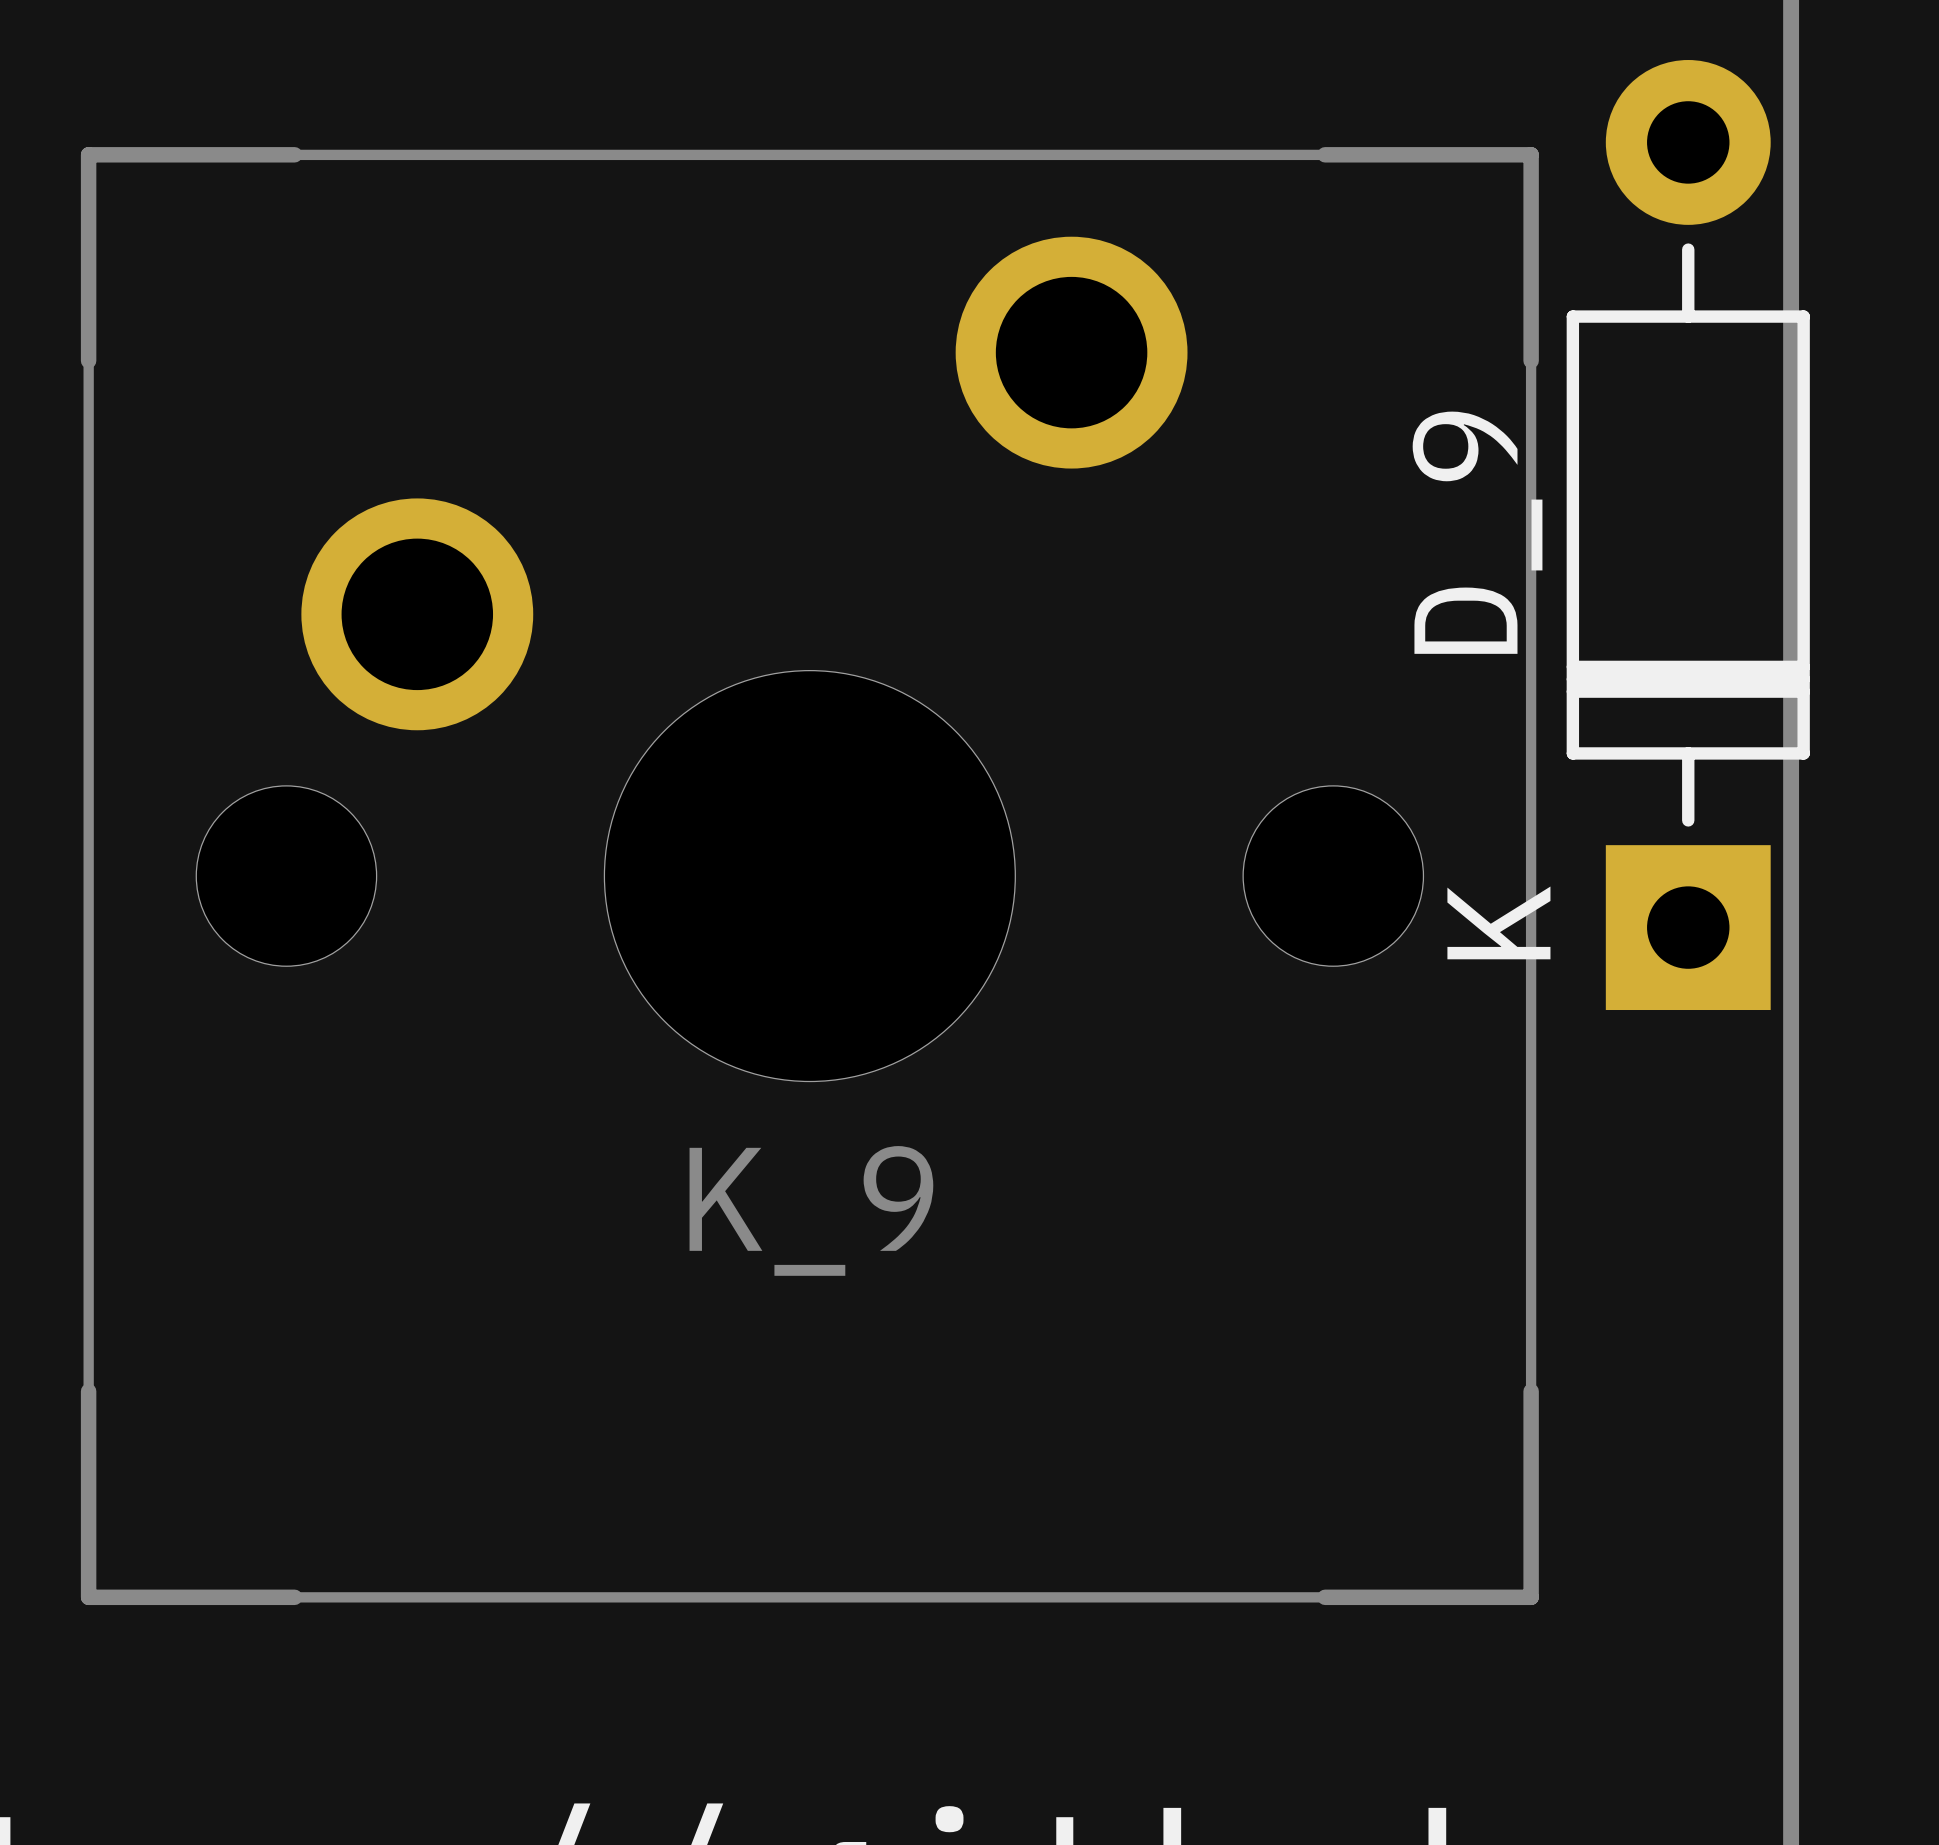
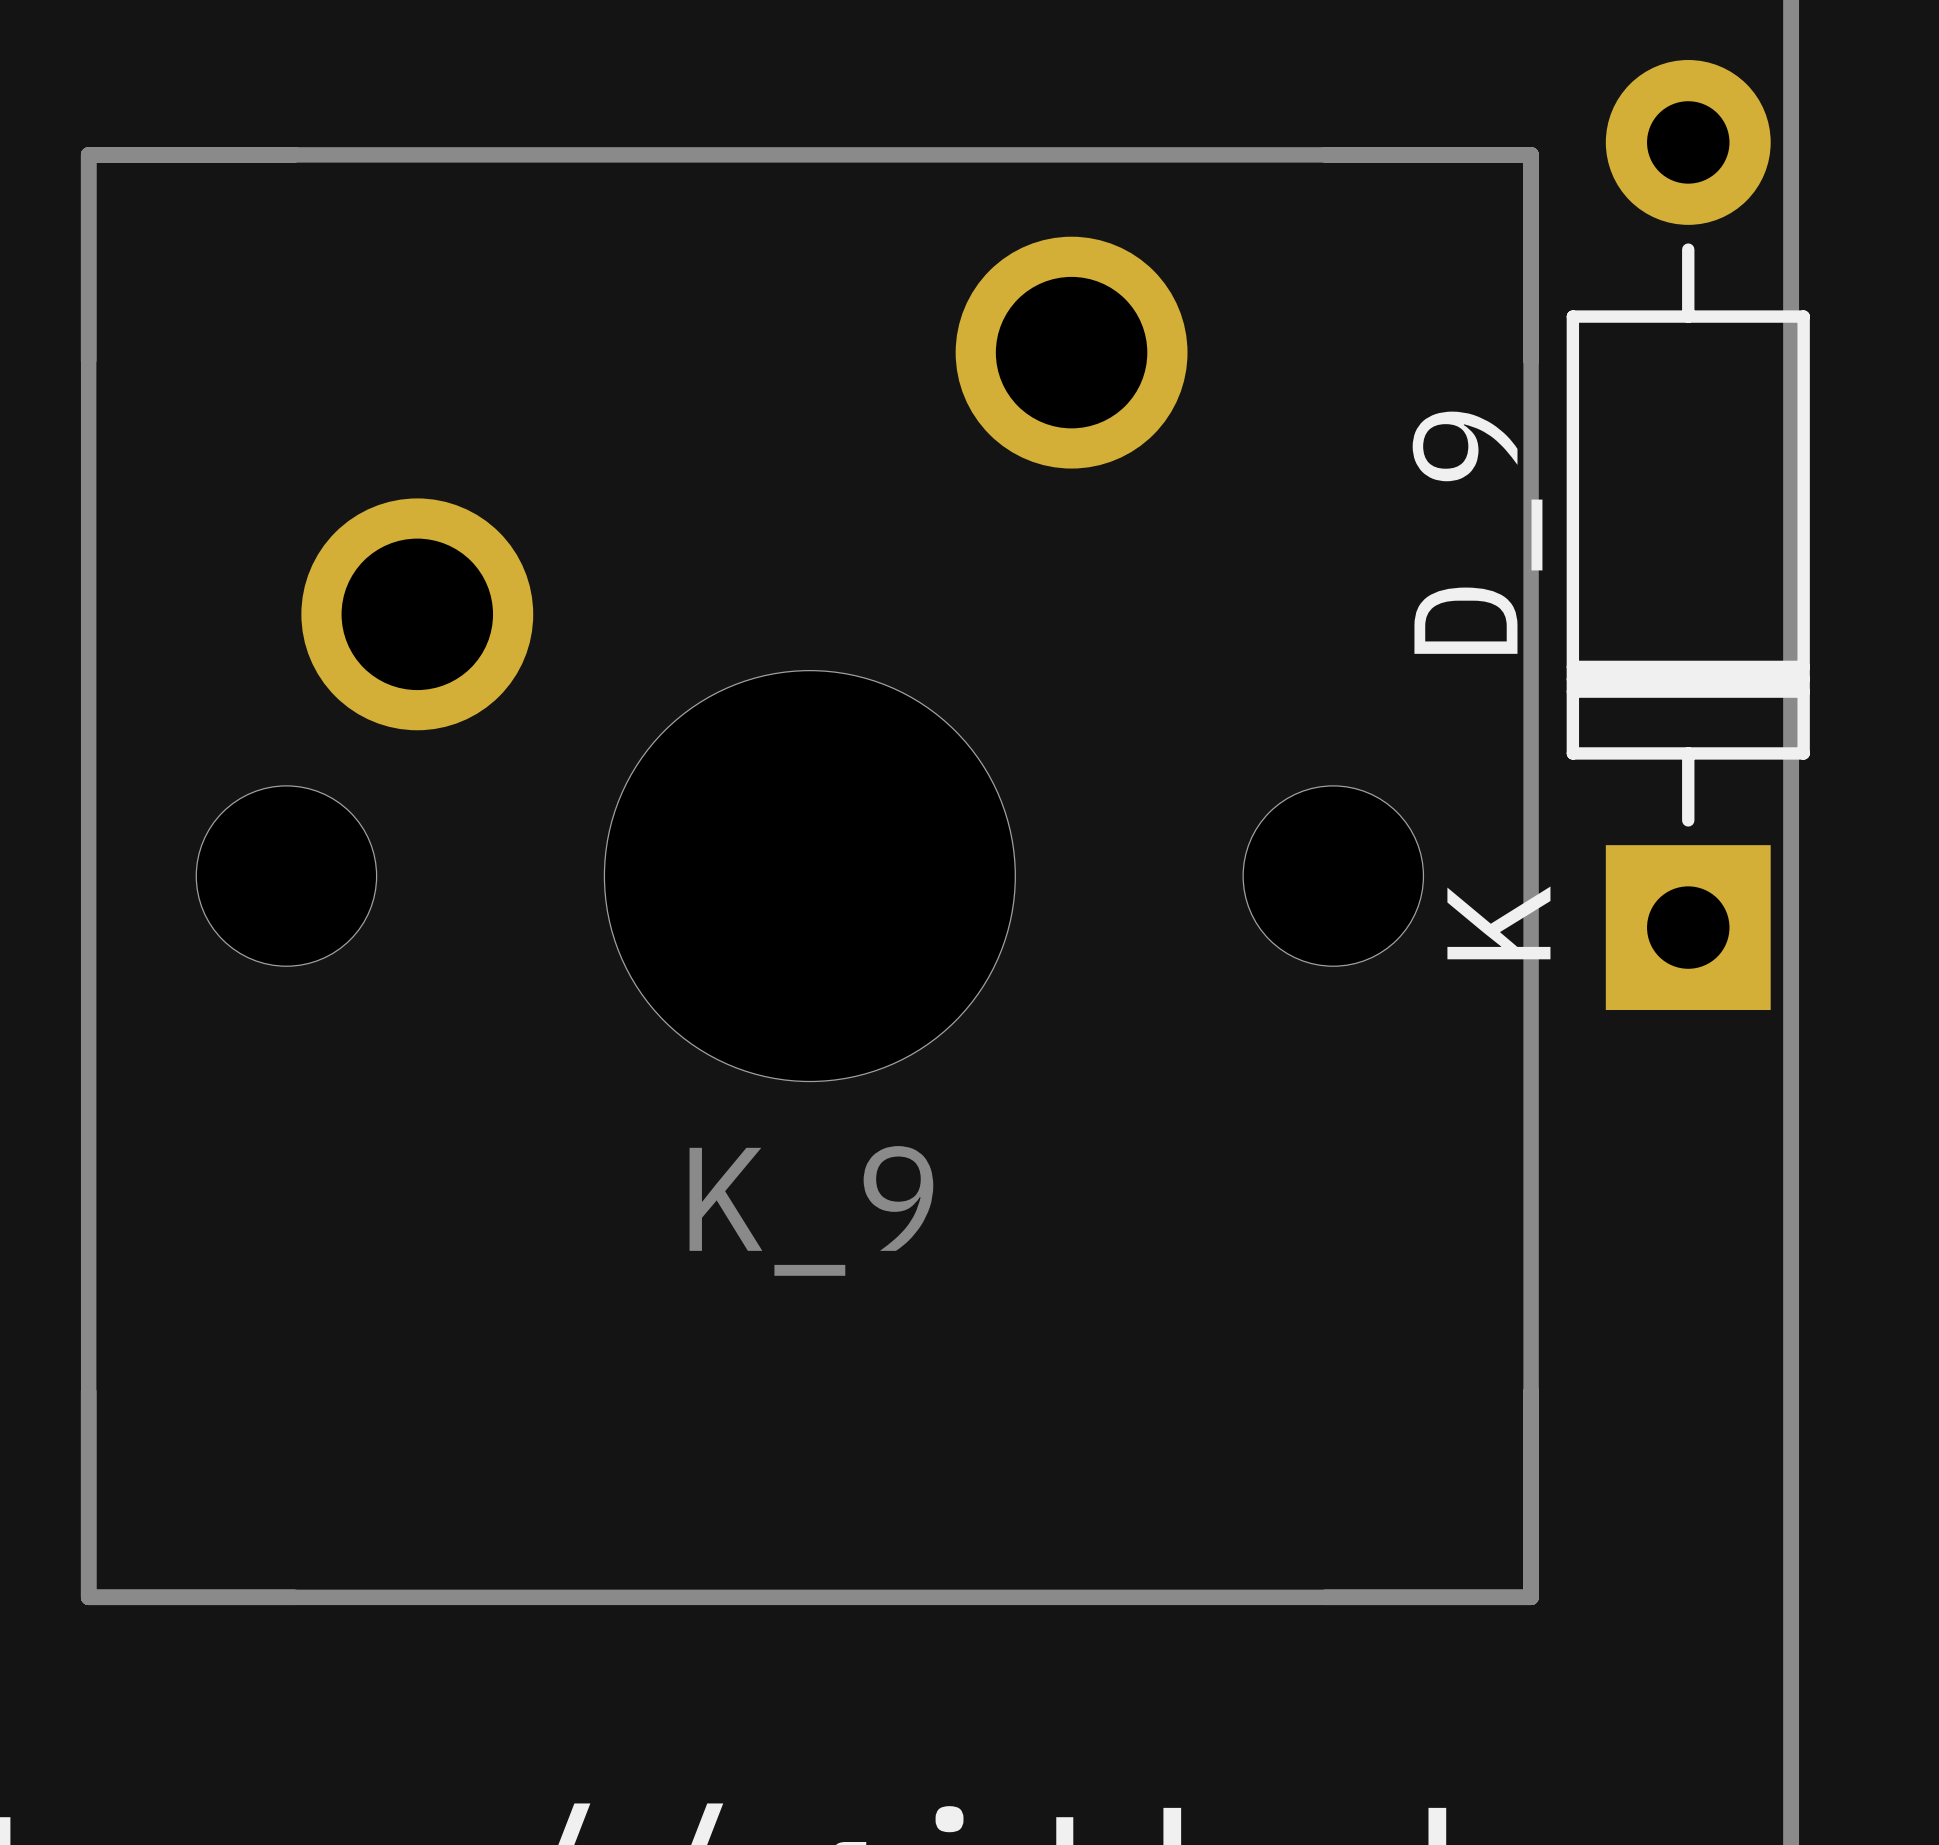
line width: thin (88, 154) (1531, 154) (1531, 1597) (88, 1597) (88, 154) -> thick (88, 154) (1531, 154) (1531, 1597) (88, 1597) (88, 154)

